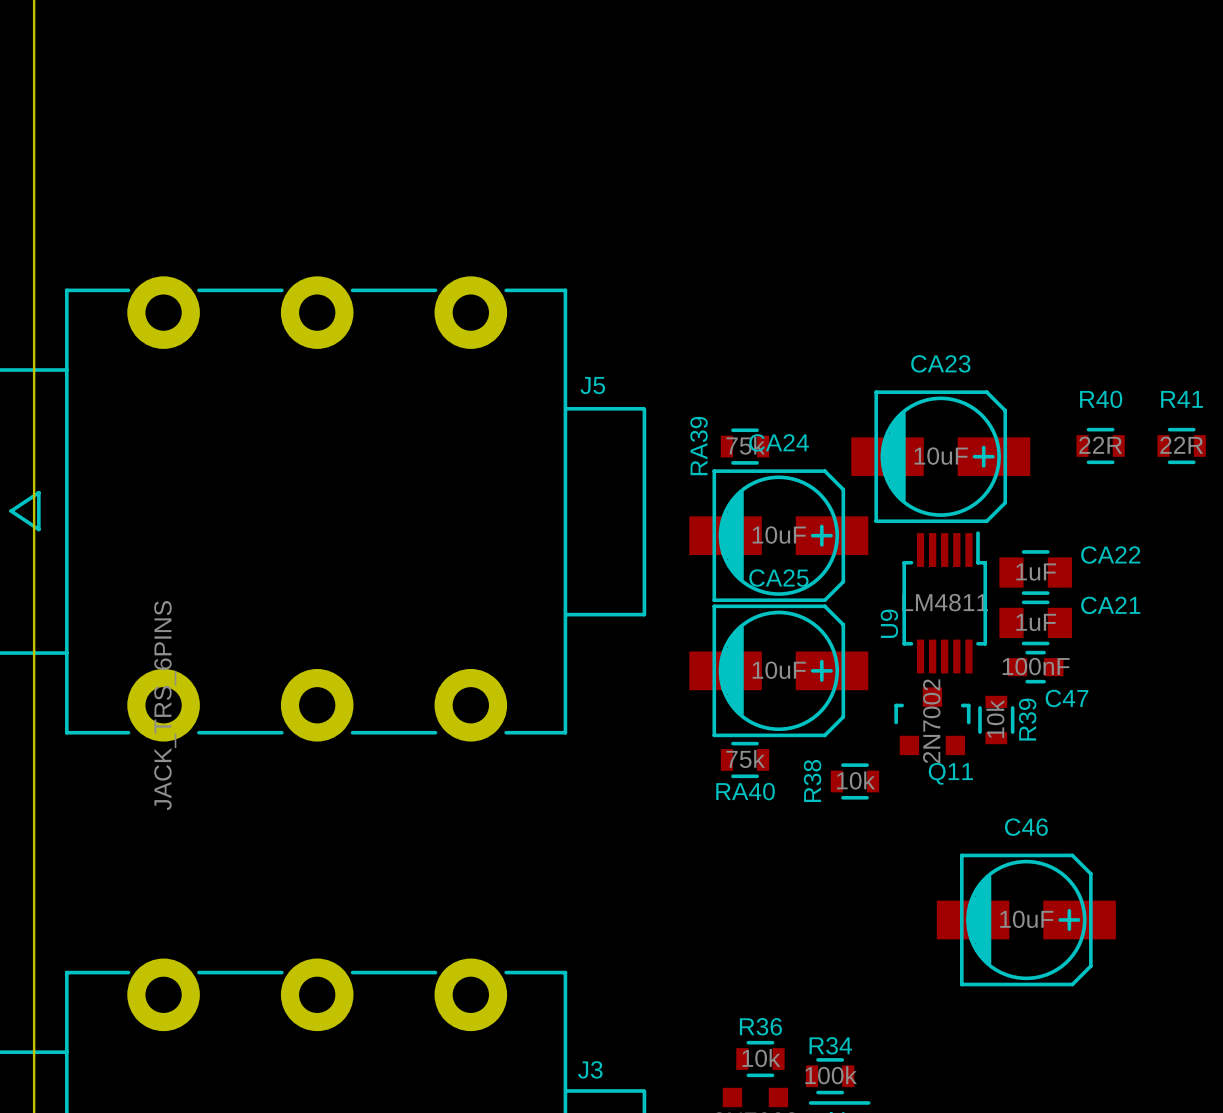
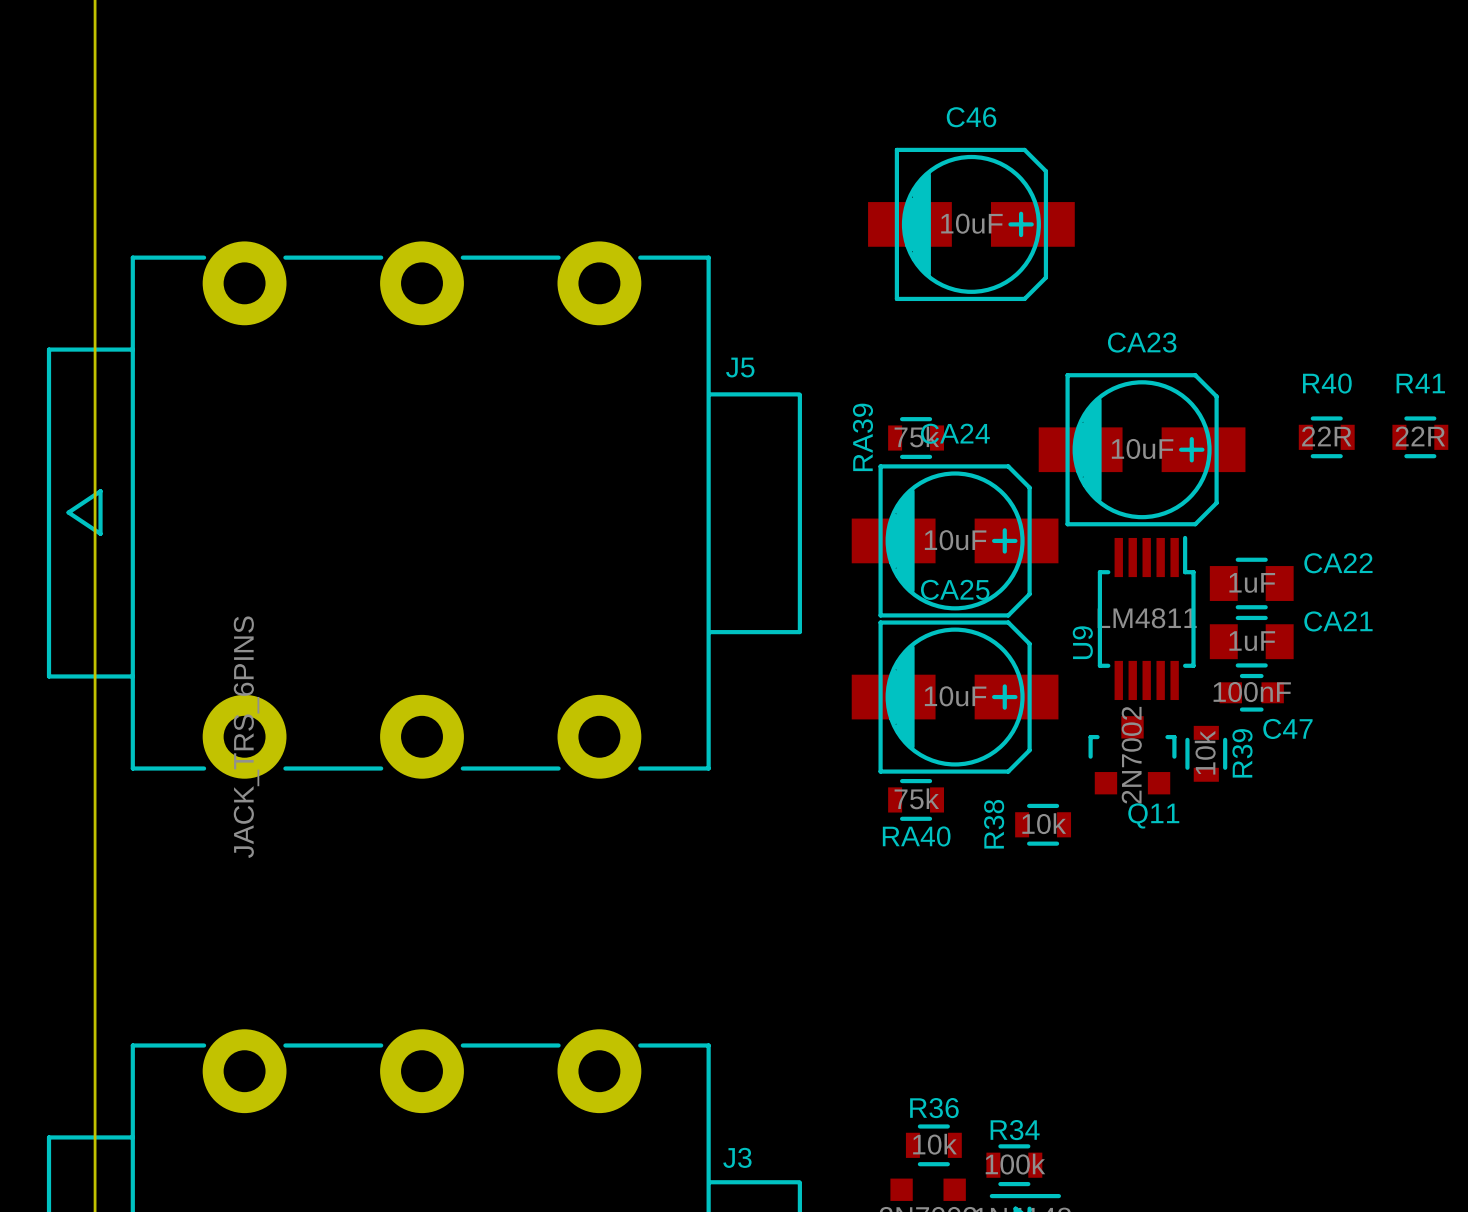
C46 position: (1026, 919) -> (971, 224)

